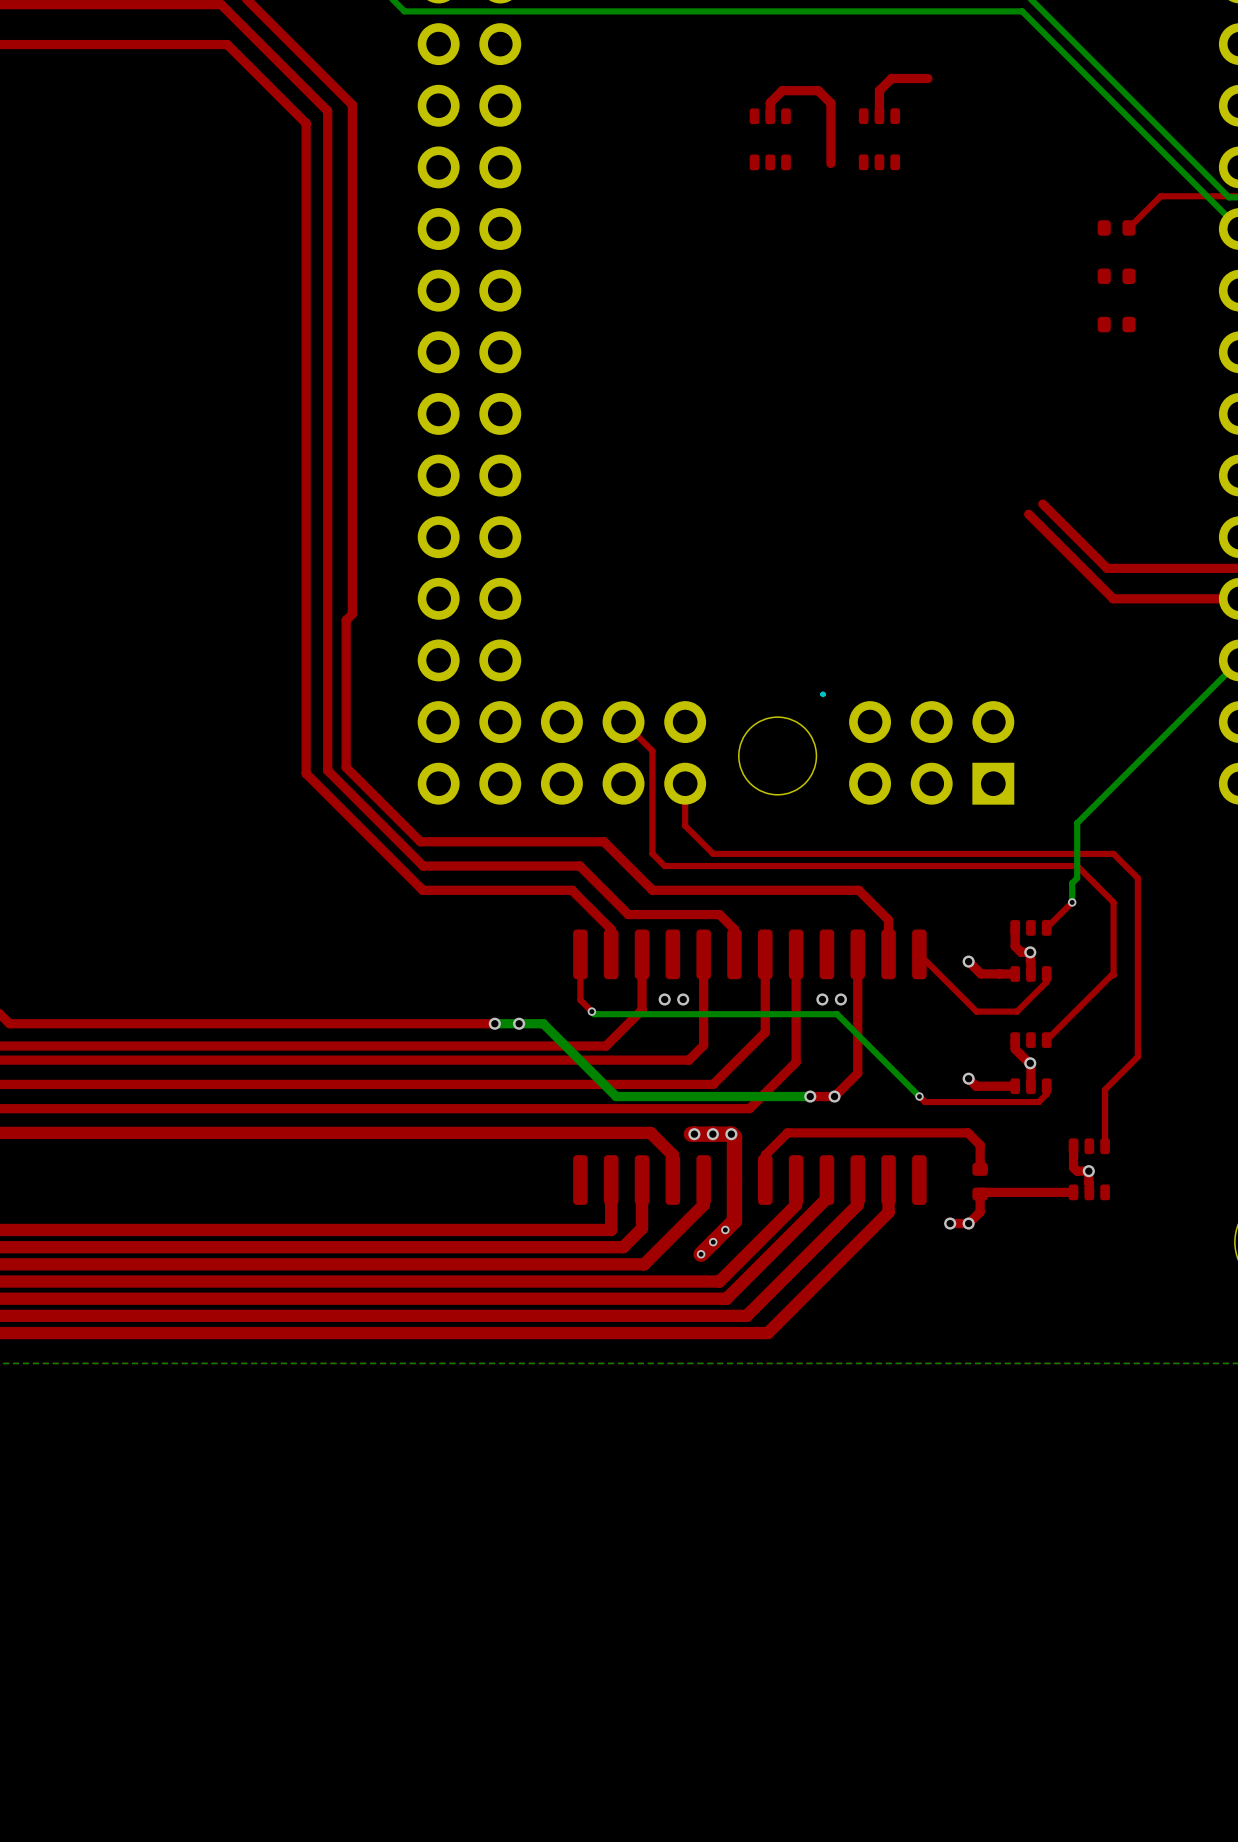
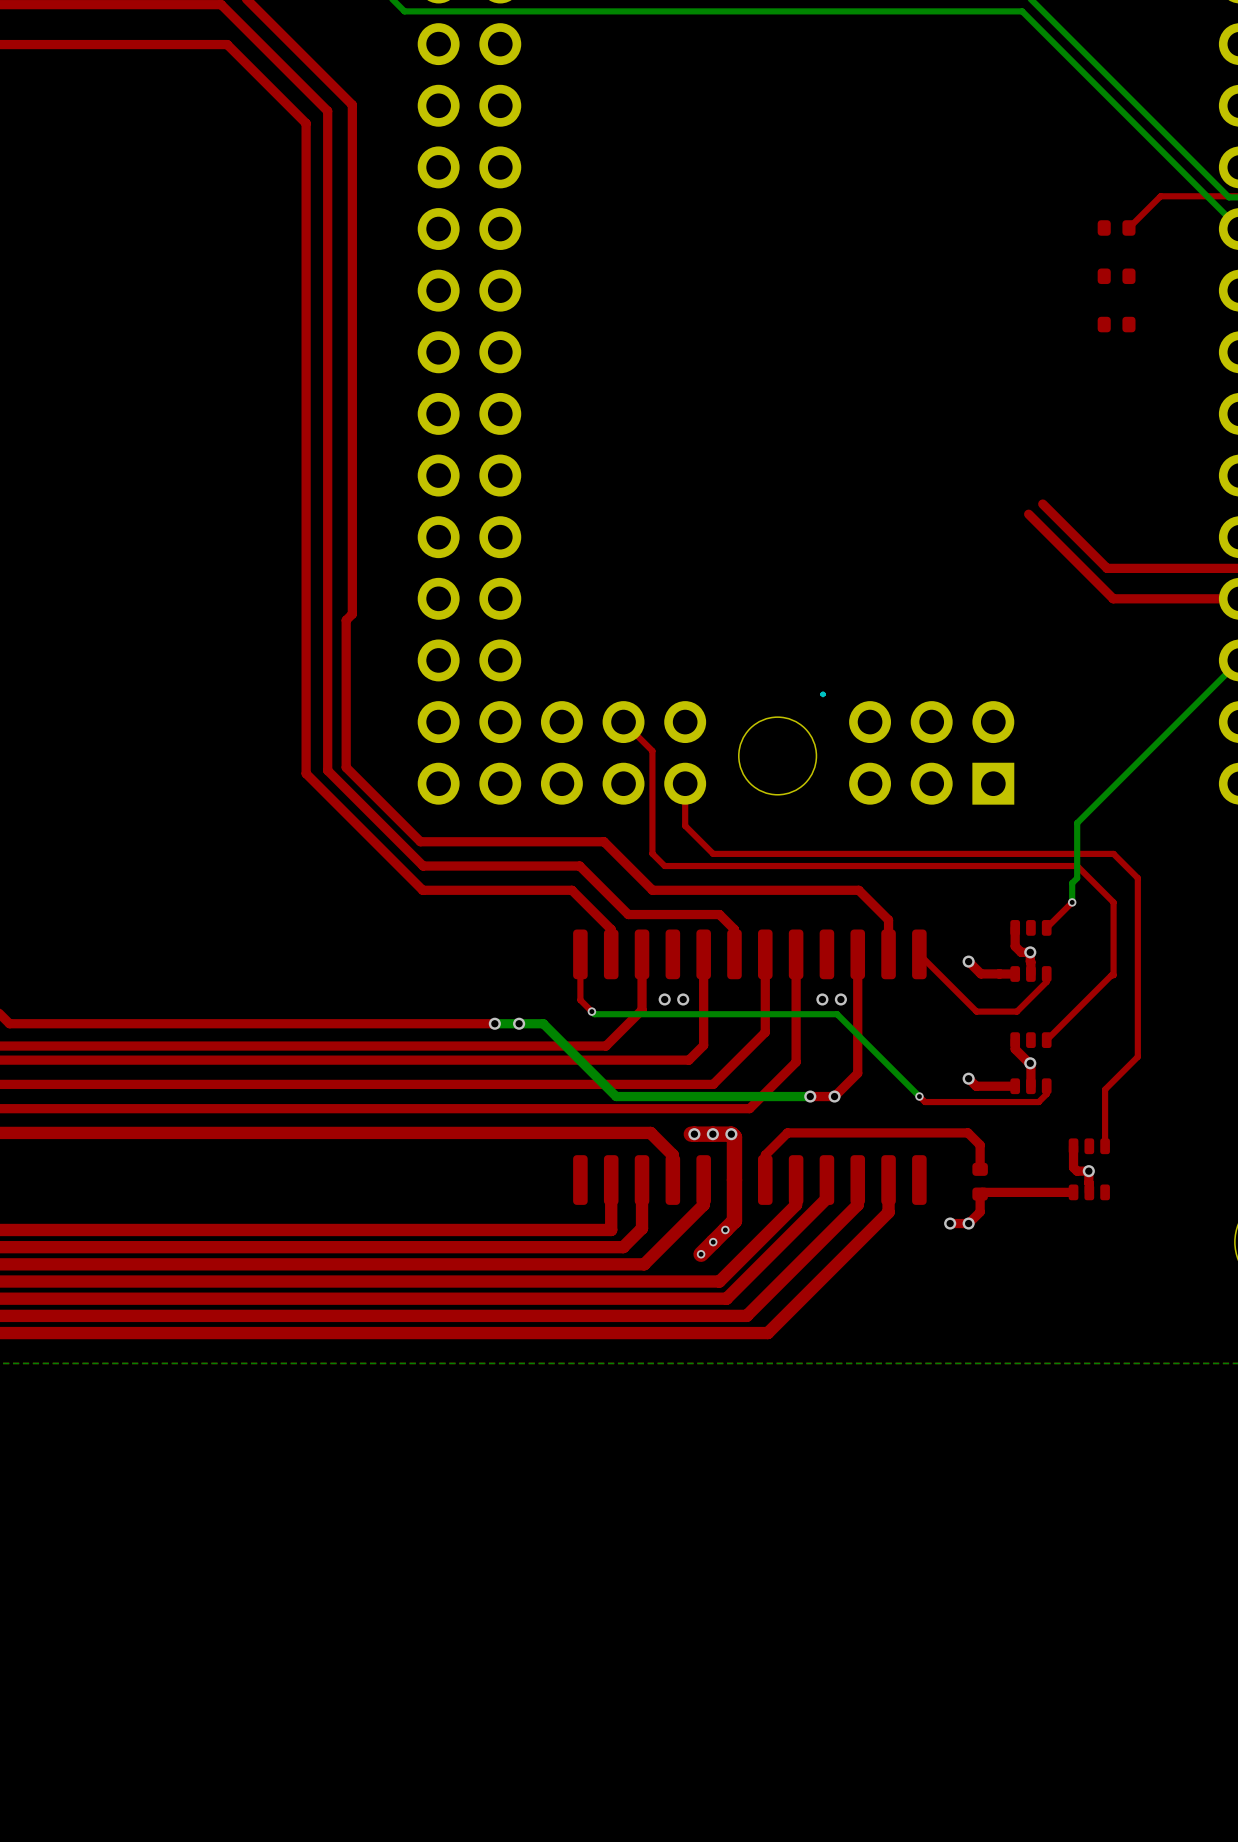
top track: (927, 78) (891, 78) (879, 90) (879, 116) -> none
top track: (770, 116) (770, 102) (782, 90) (818, 90) (830, 103) (830, 163) -> none
part: (770, 139) -> none
part: (879, 139) -> none

